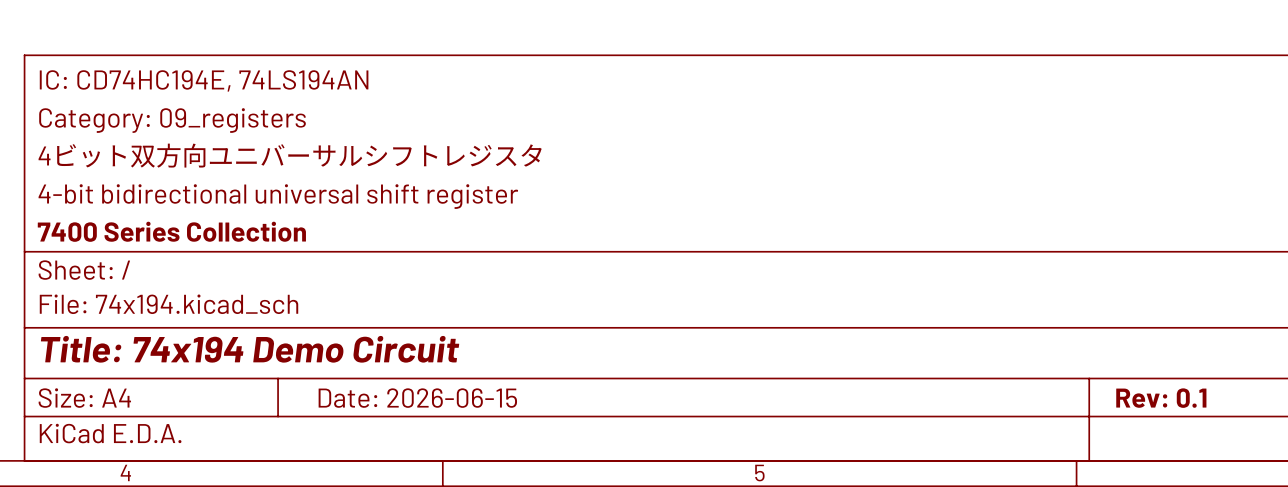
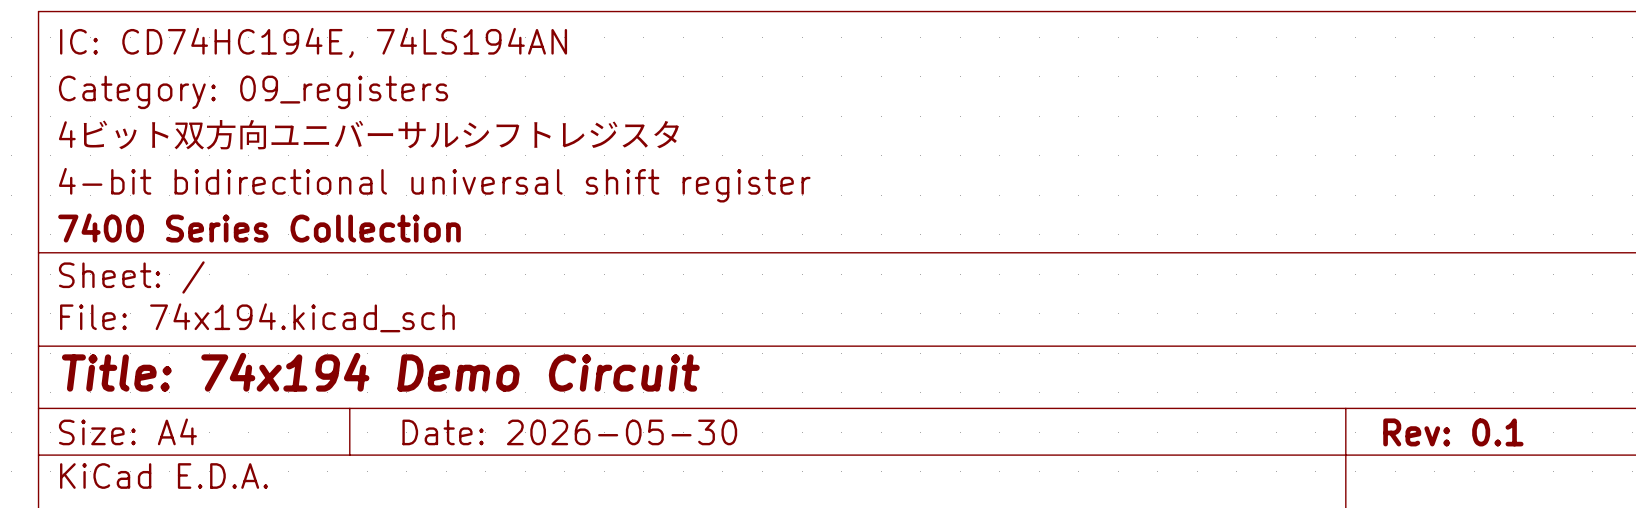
title block: Date: 2026-06-15 (417, 398) -> Date: 2026-05-30 (569, 432)

